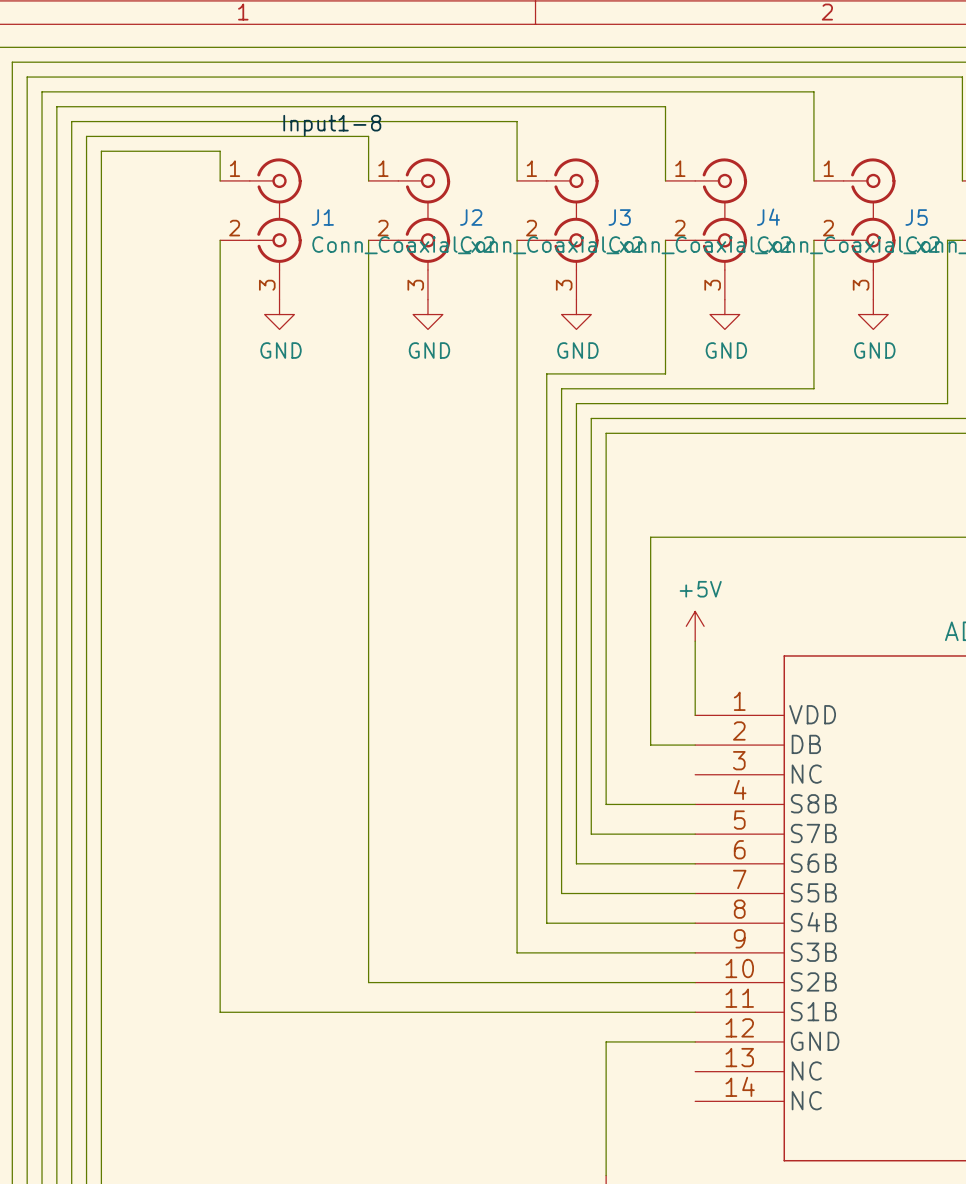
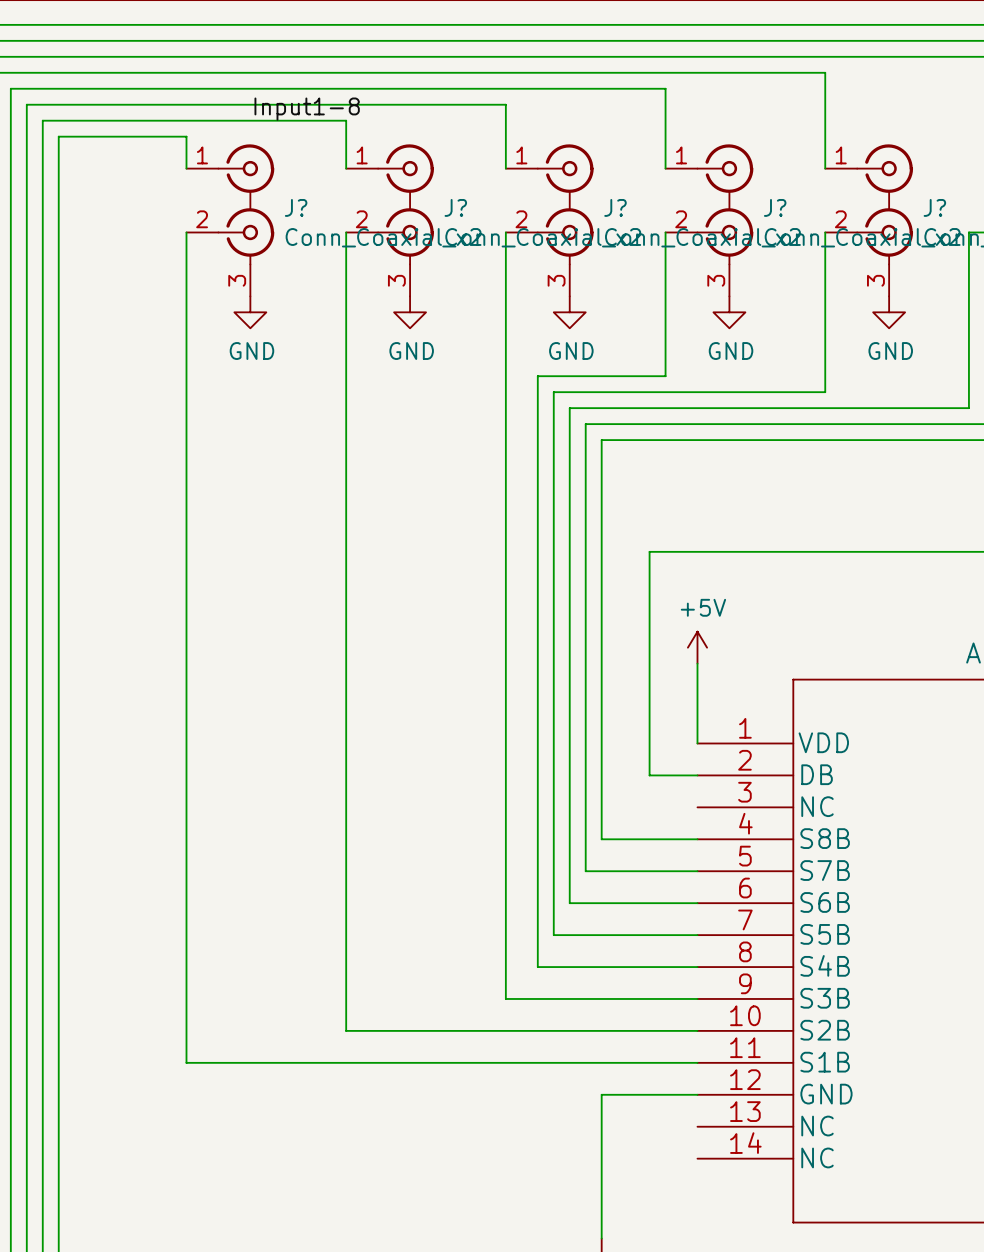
J1 name: J1 (322, 217) -> J? (296, 207)
J2 name: J2 (471, 217) -> J? (455, 207)
J3 name: J3 (619, 217) -> J? (615, 207)
J4 name: J4 (768, 217) -> J? (775, 207)
J5 name: J5 (916, 217) -> J? (934, 207)

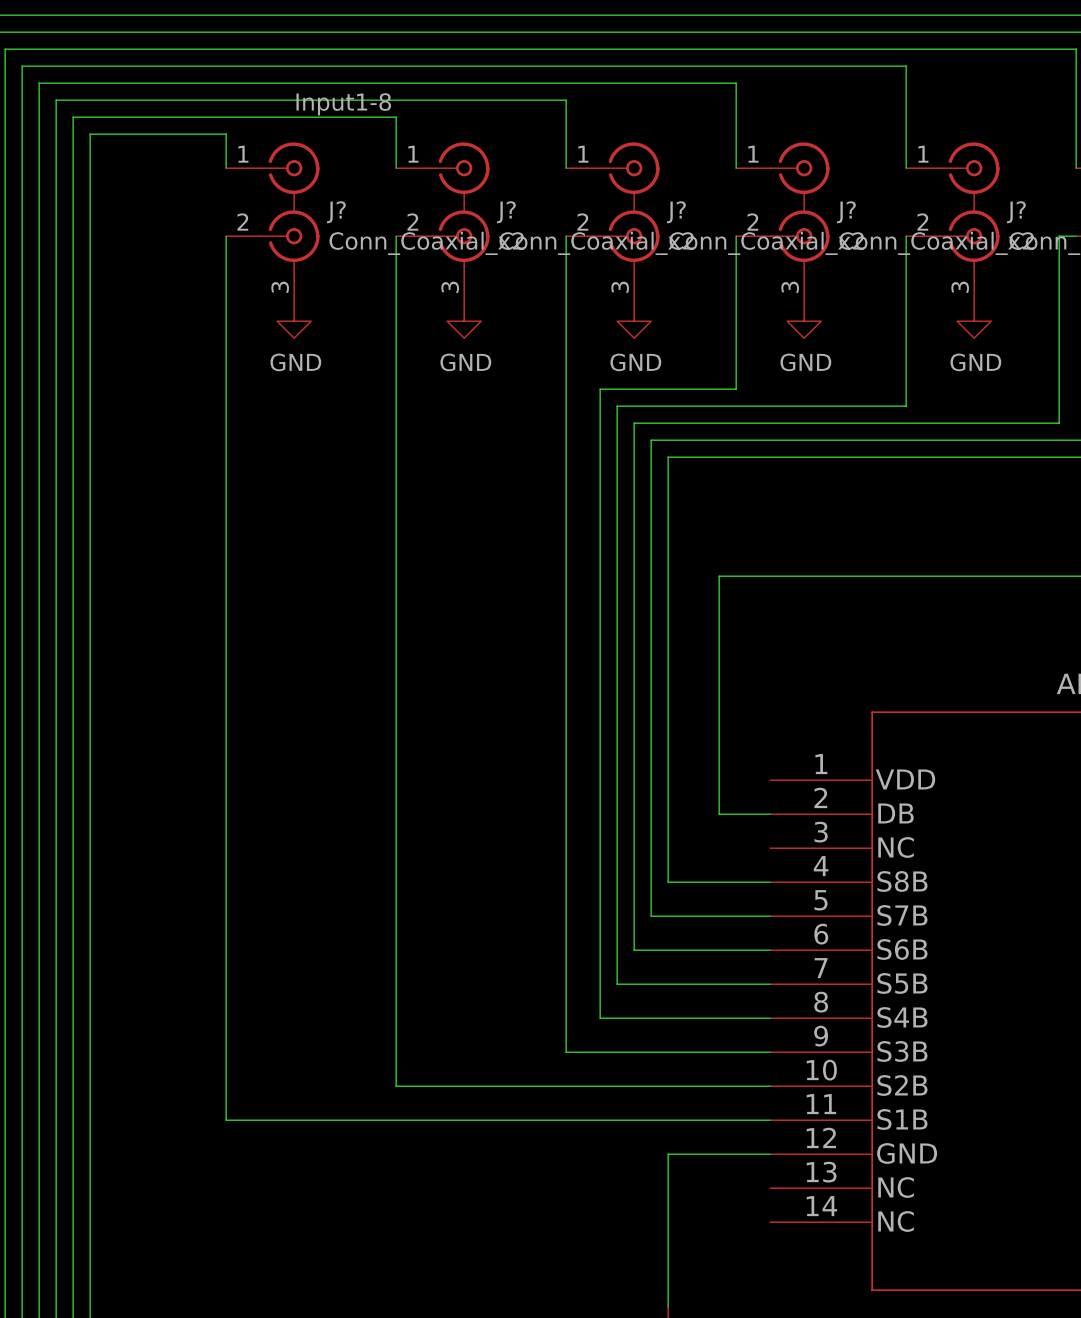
power symbol: +5V (697, 647) -> none
wire: (697, 663) (697, 743) -> none

